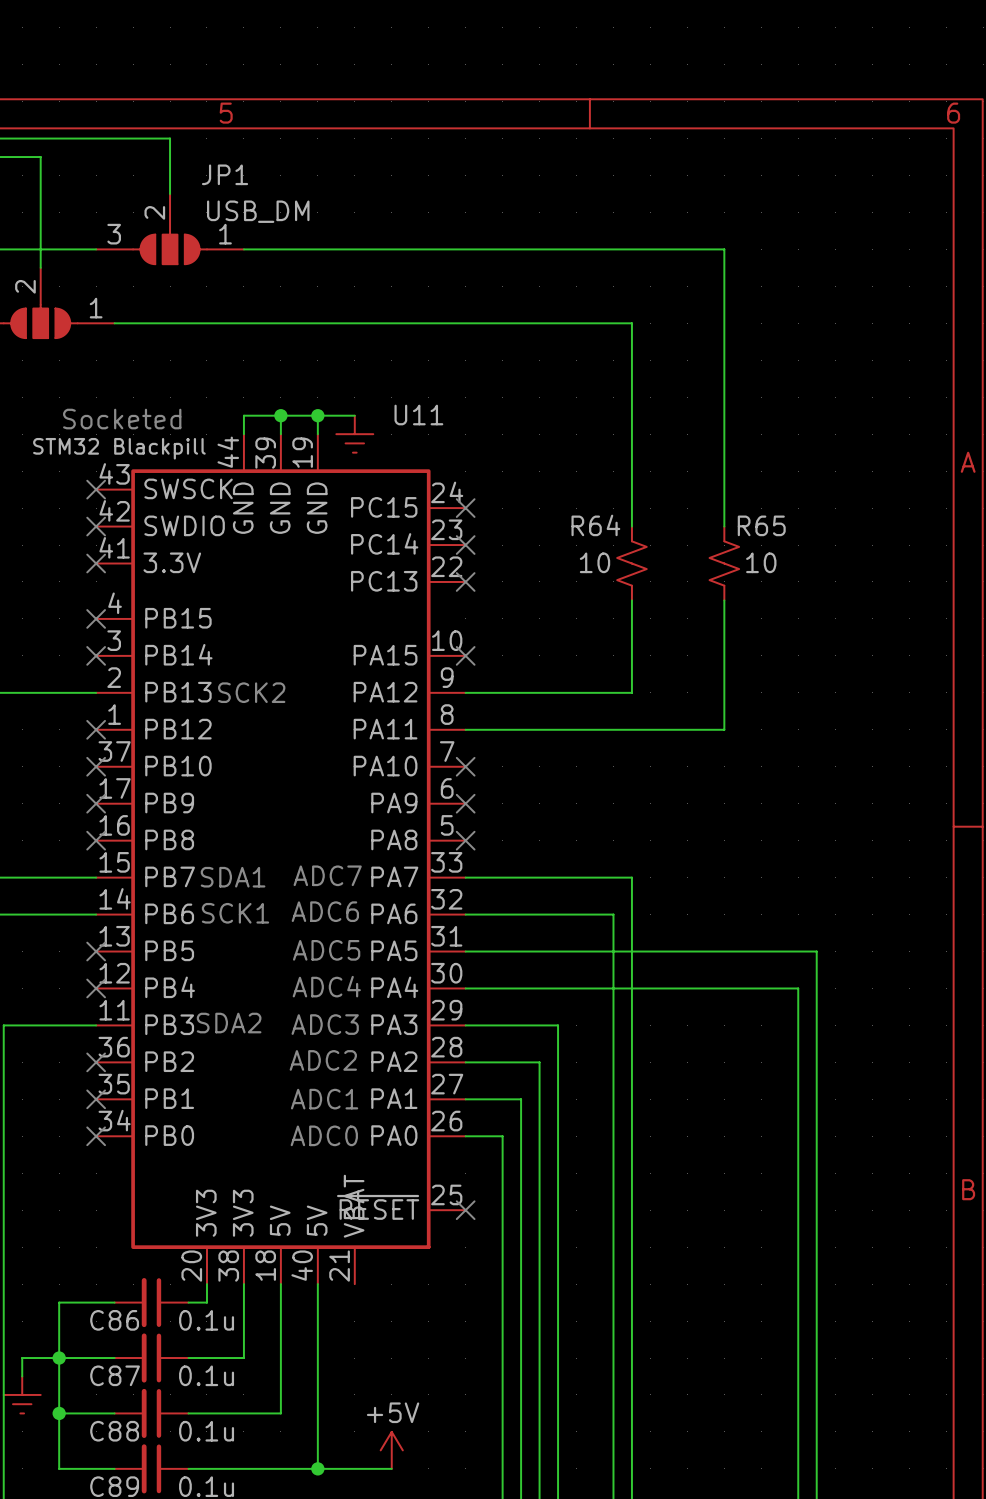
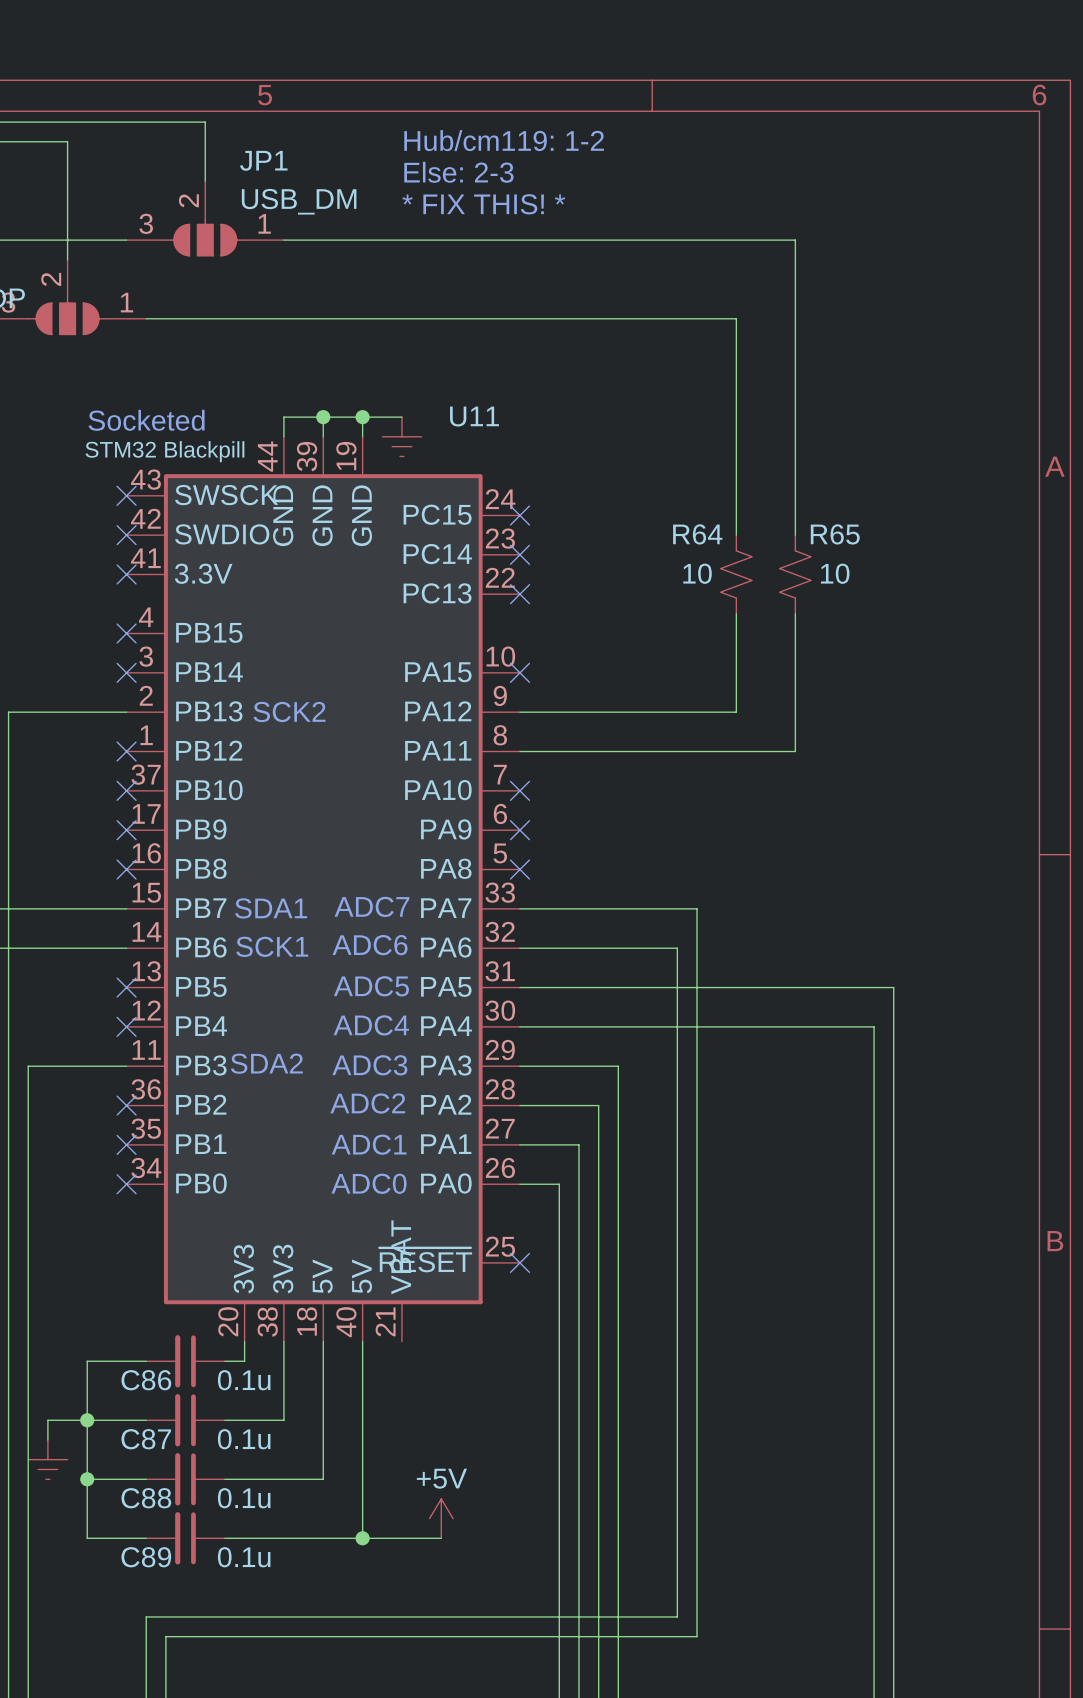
text: none -> Hub/cm119: 1-2 (504, 140)
text: none -> Else: 2-3 (458, 172)
text: none -> * FIX THIS! * (483, 204)
wire: (631, 323) (631, 526) -> (697, 318) (736, 318) (736, 535)
R64 position: (631, 563) -> (736, 574)
wire: (631, 600) (631, 692) -> (736, 613) (736, 712) (697, 712)

